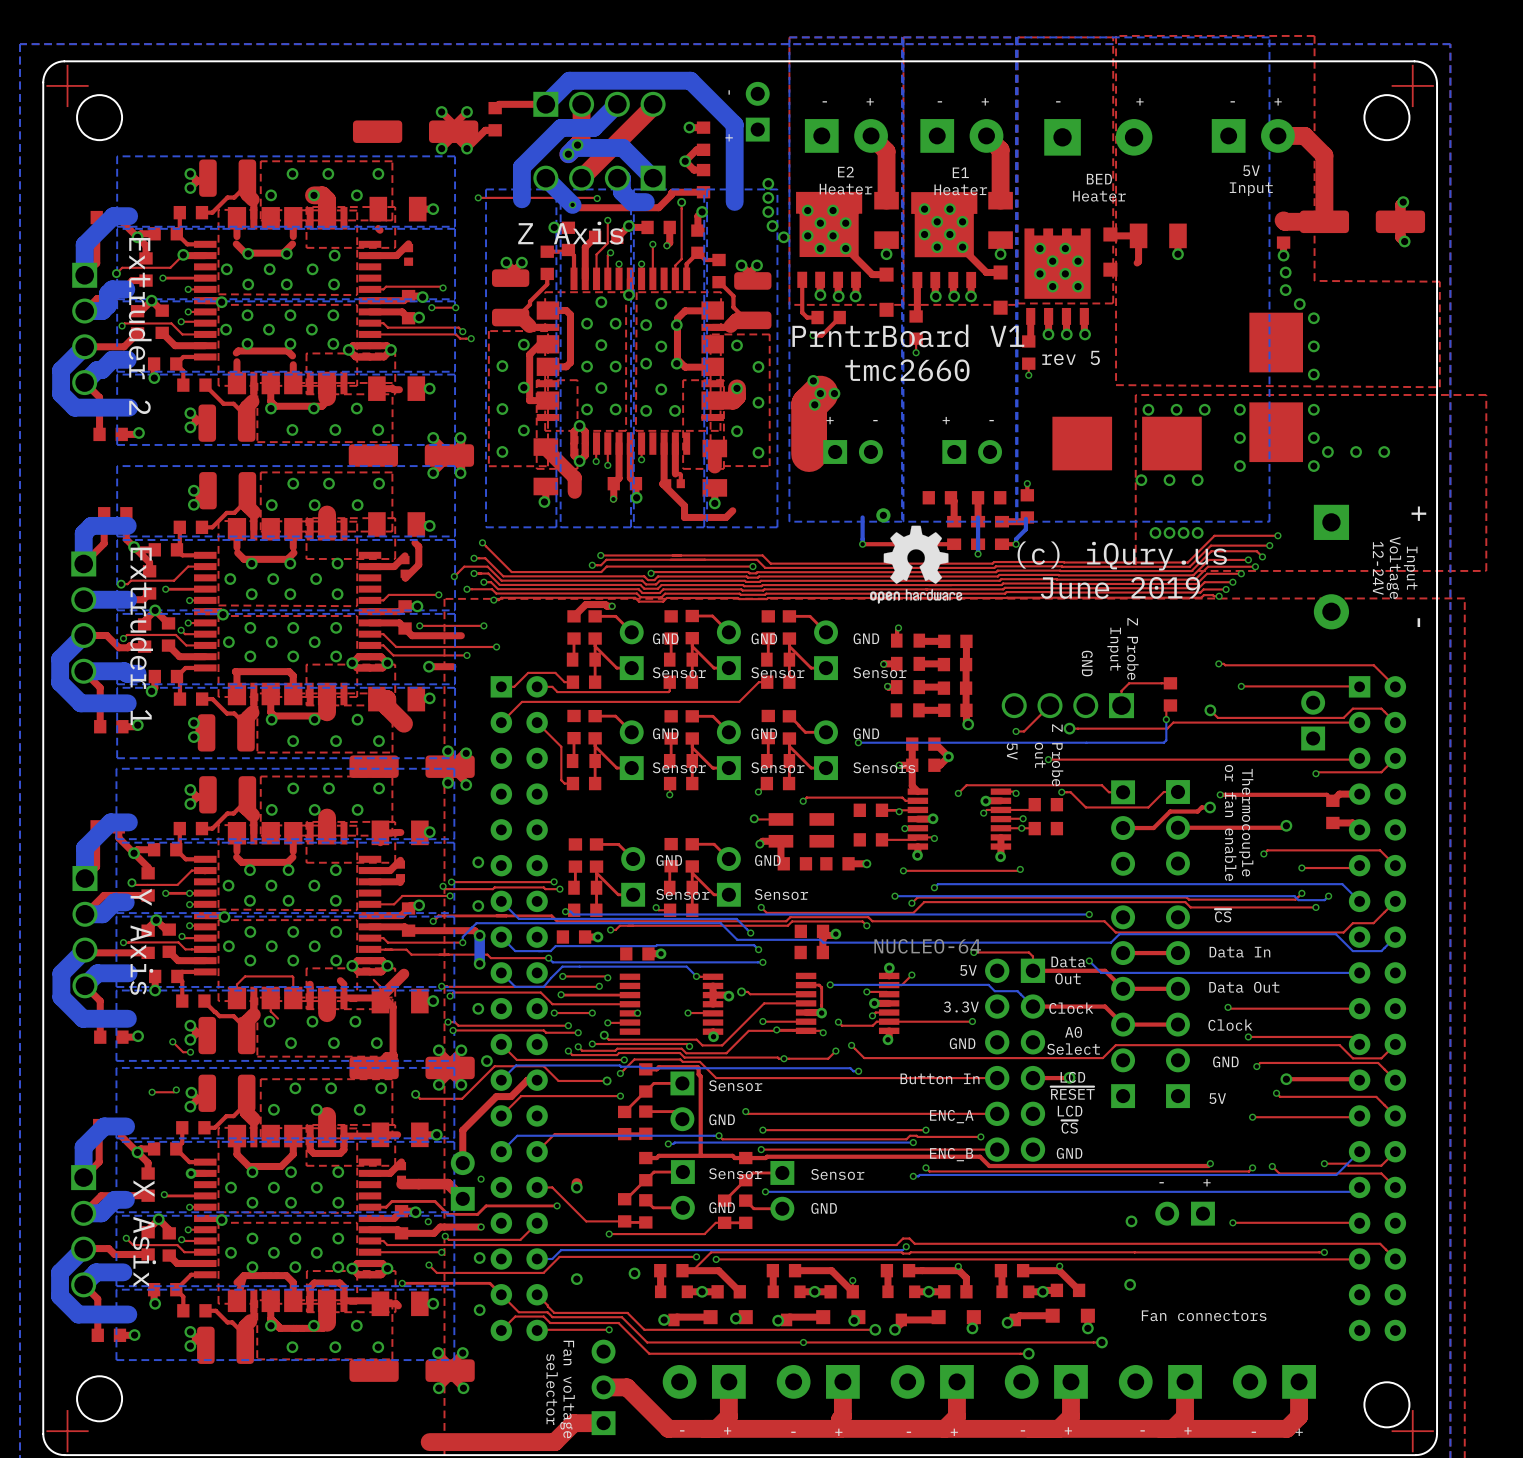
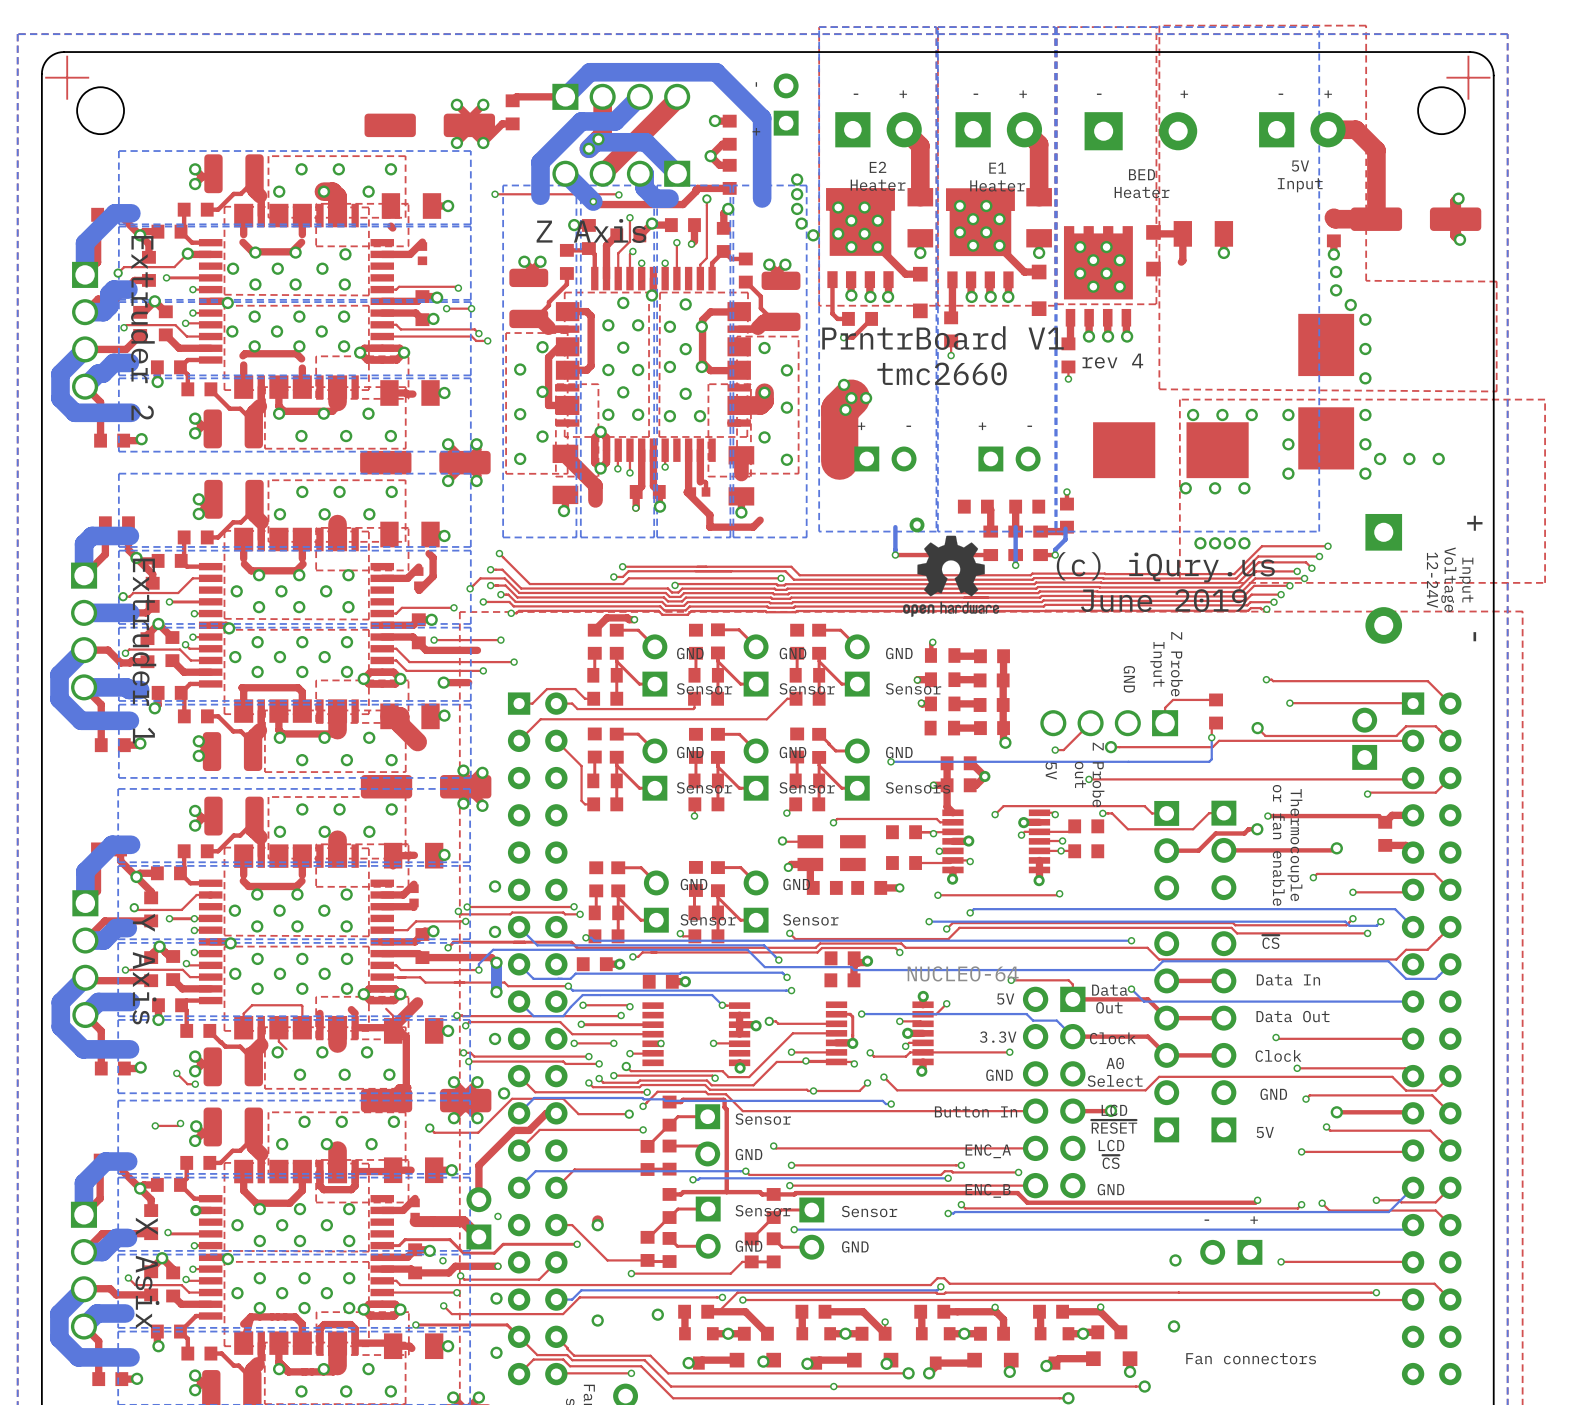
text: rev 5 (1071, 357) -> rev 4 (1112, 361)

